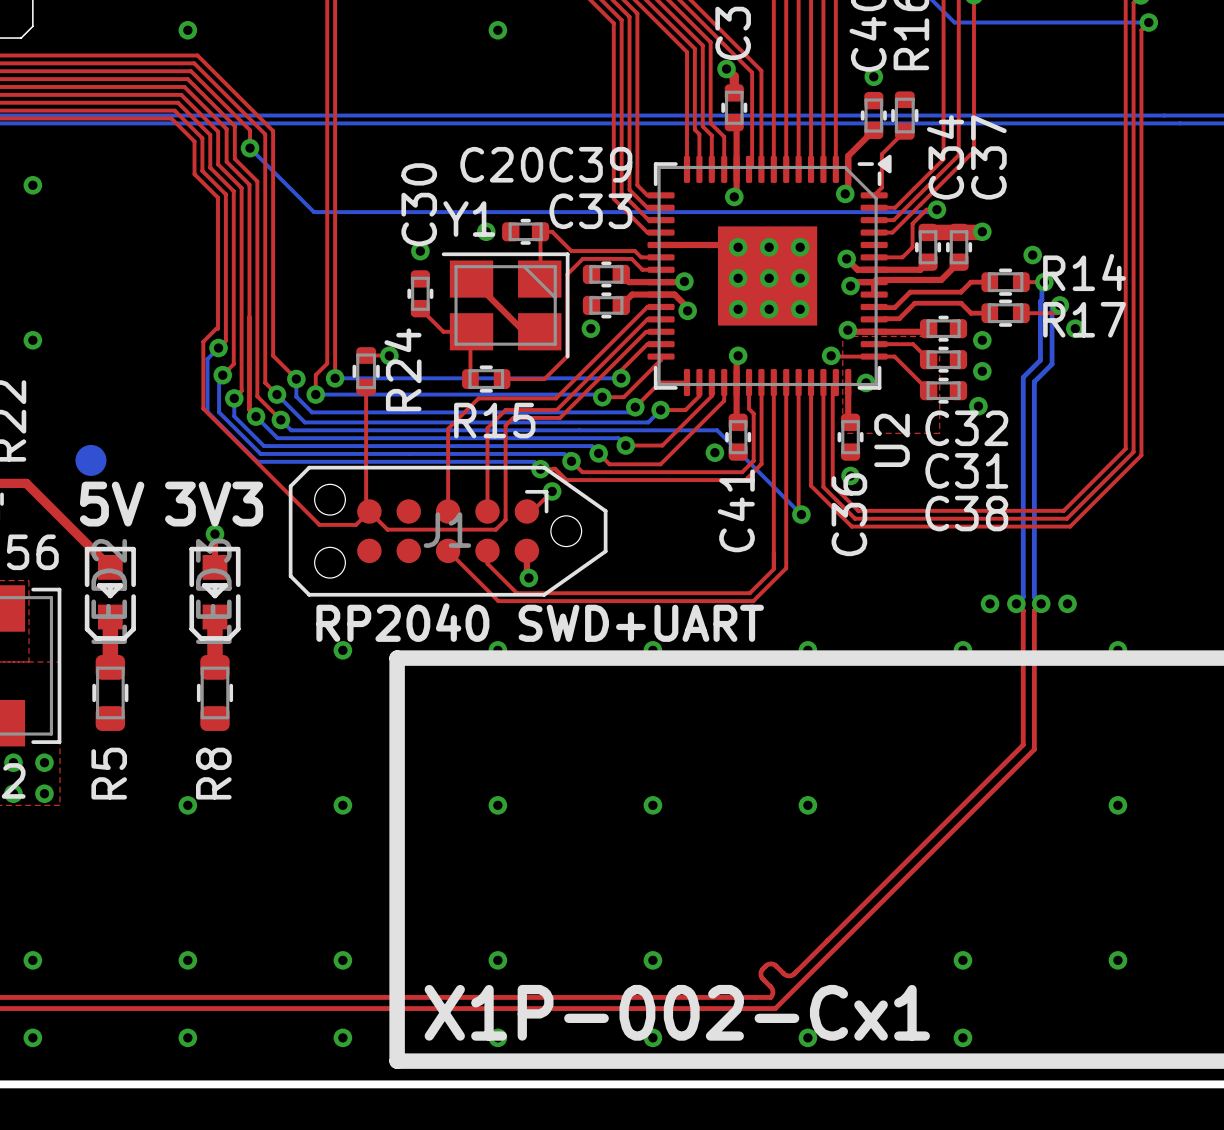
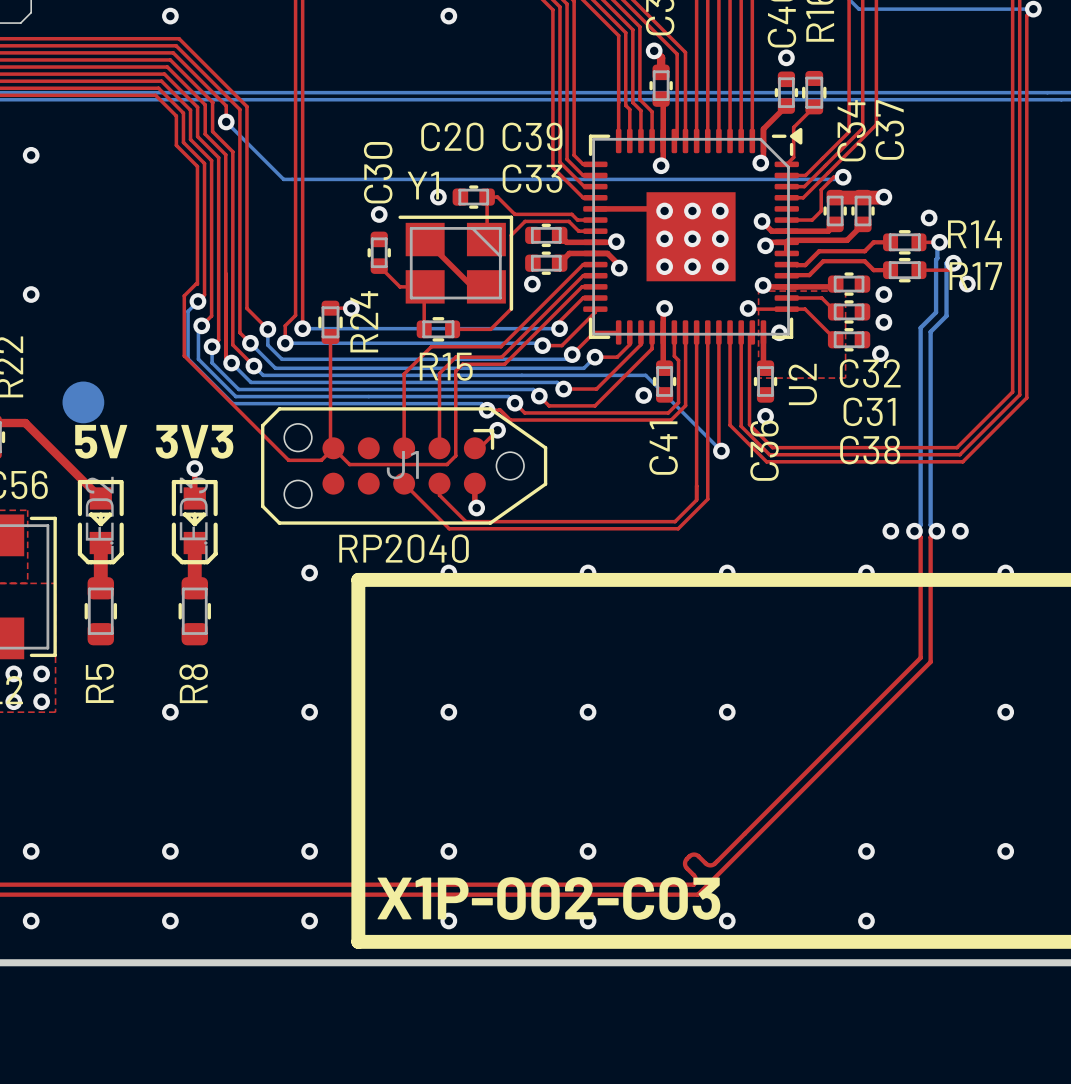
part footprint: [75, 444, 107, 476] -> [62, 381, 105, 424]
text: none -> RP2040 (404, 548)
text: RP2040 SWD+UART (540, 622) -> none
text: X1P-002-Cx1 (677, 1012) -> X1P-002-C03 (548, 898)

